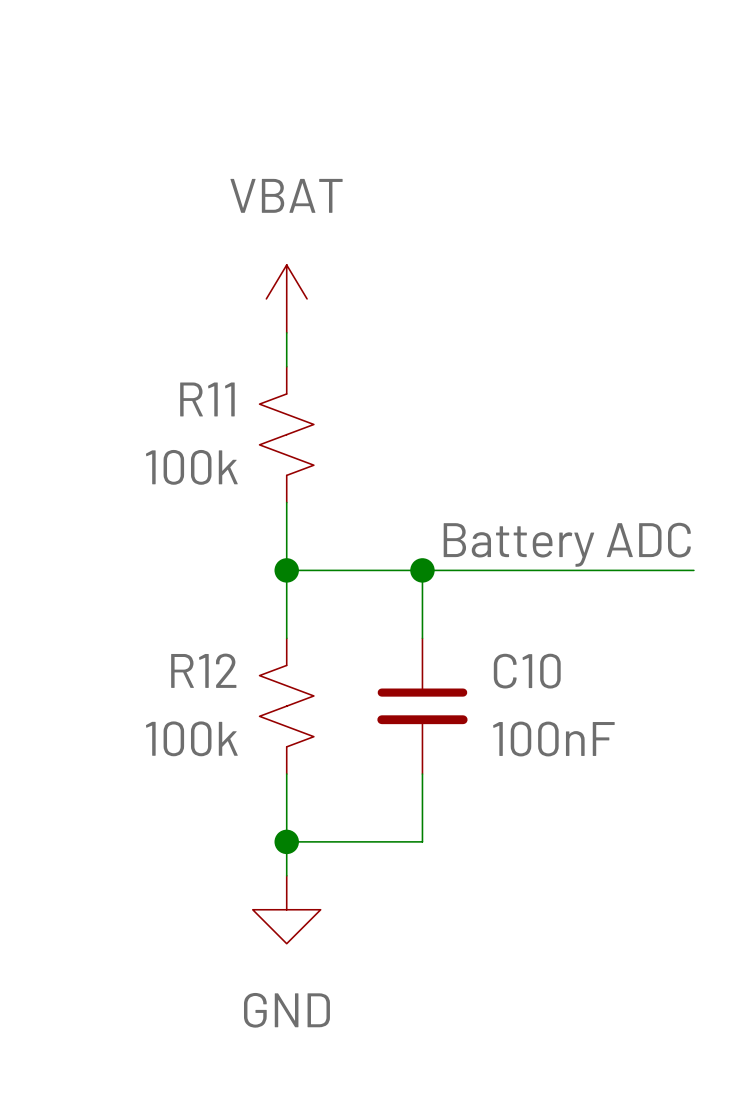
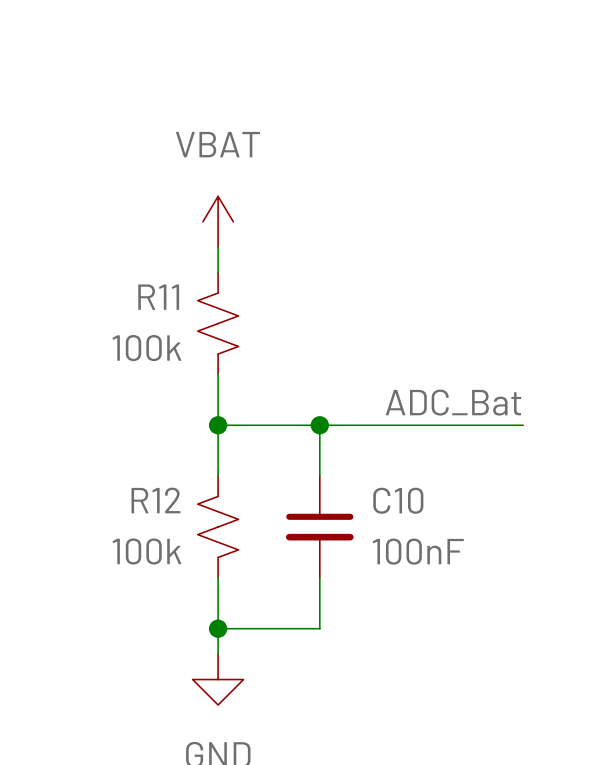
label: Battery ADC (567, 544) -> ADC_Bat (453, 402)

